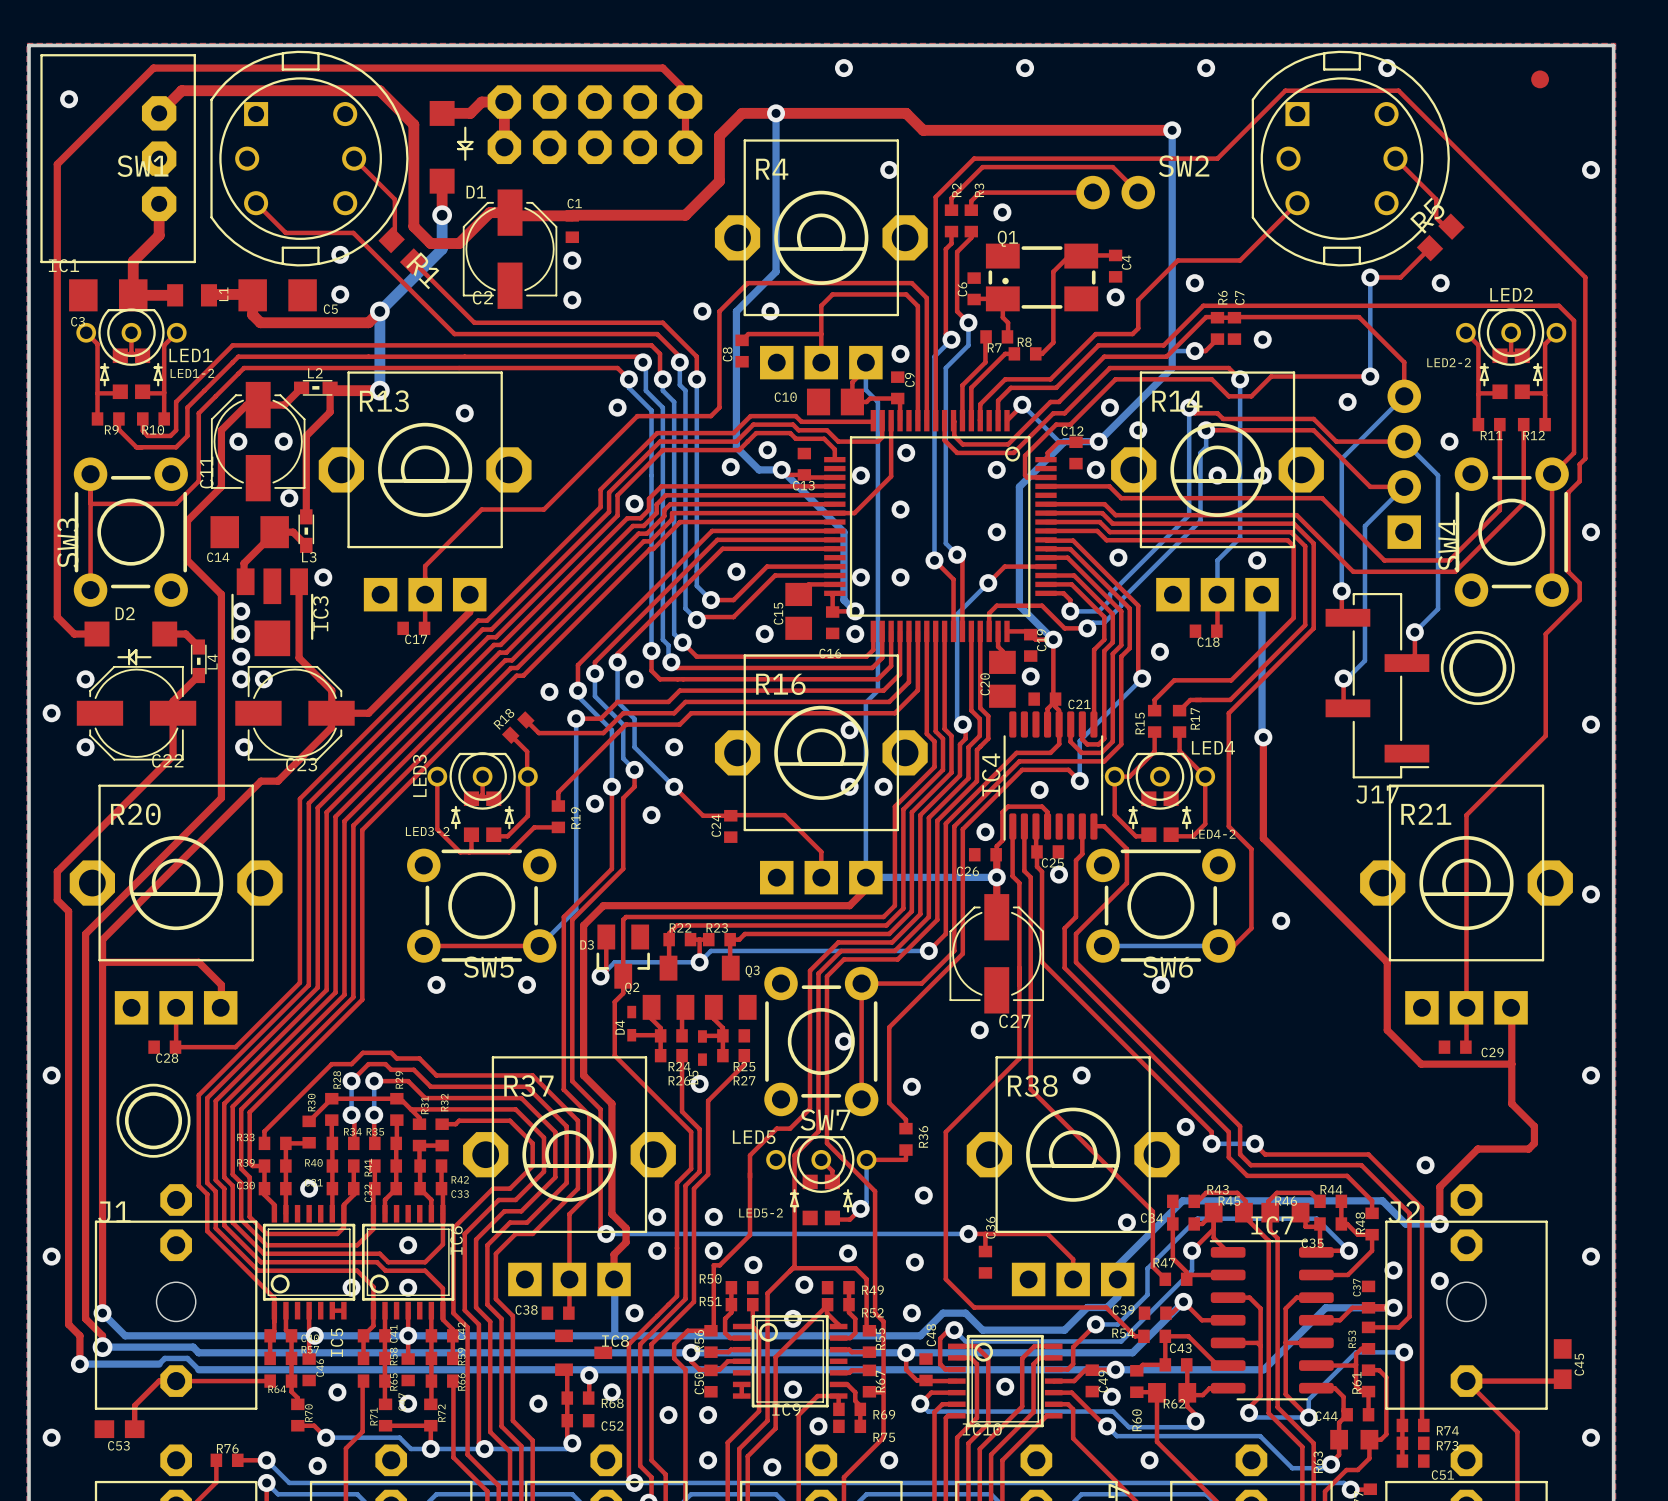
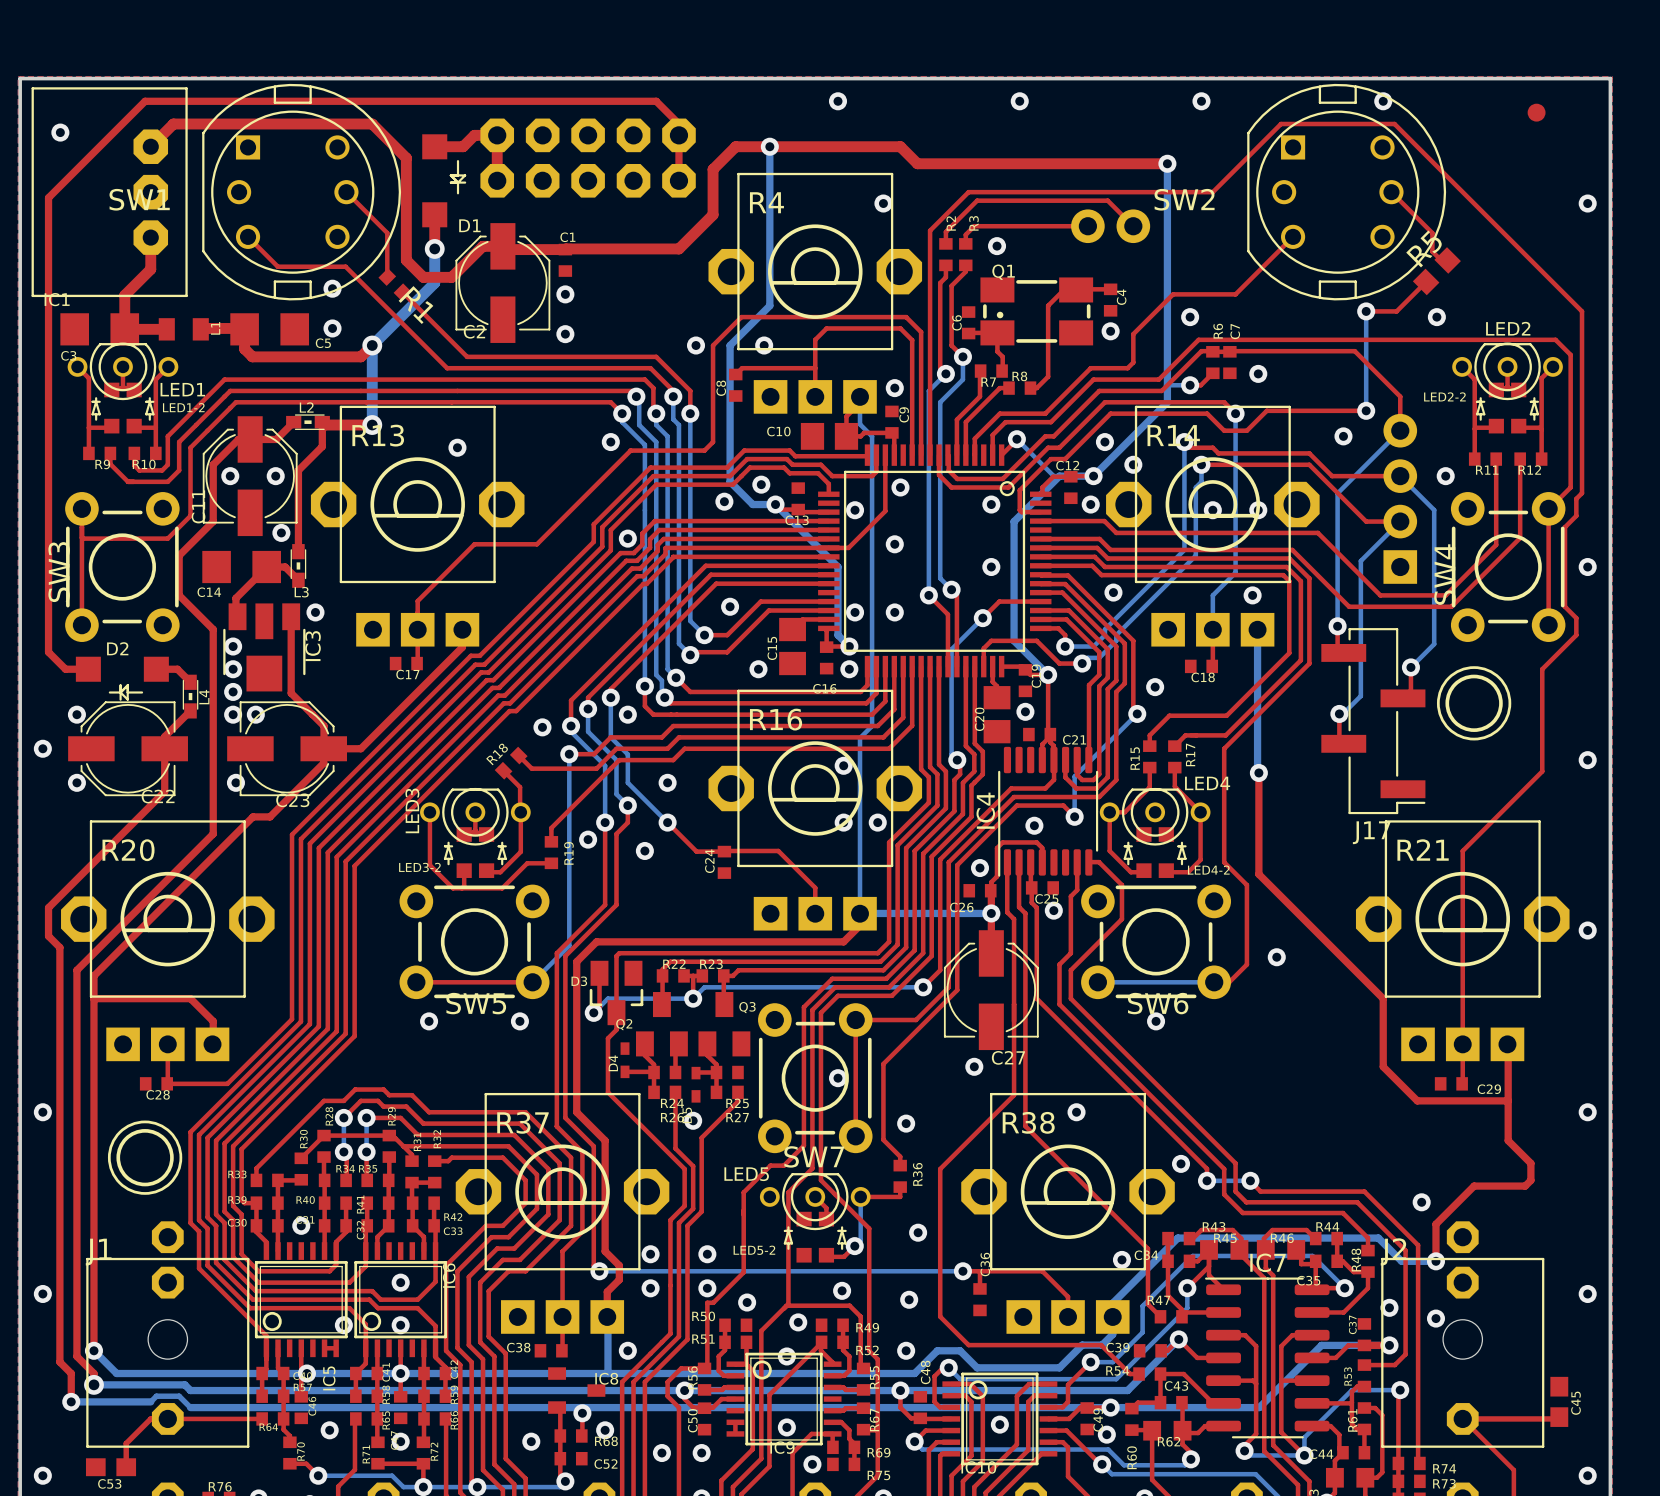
R1 footprint: [378, 226, 427, 275] -> [378, 268, 412, 302]

